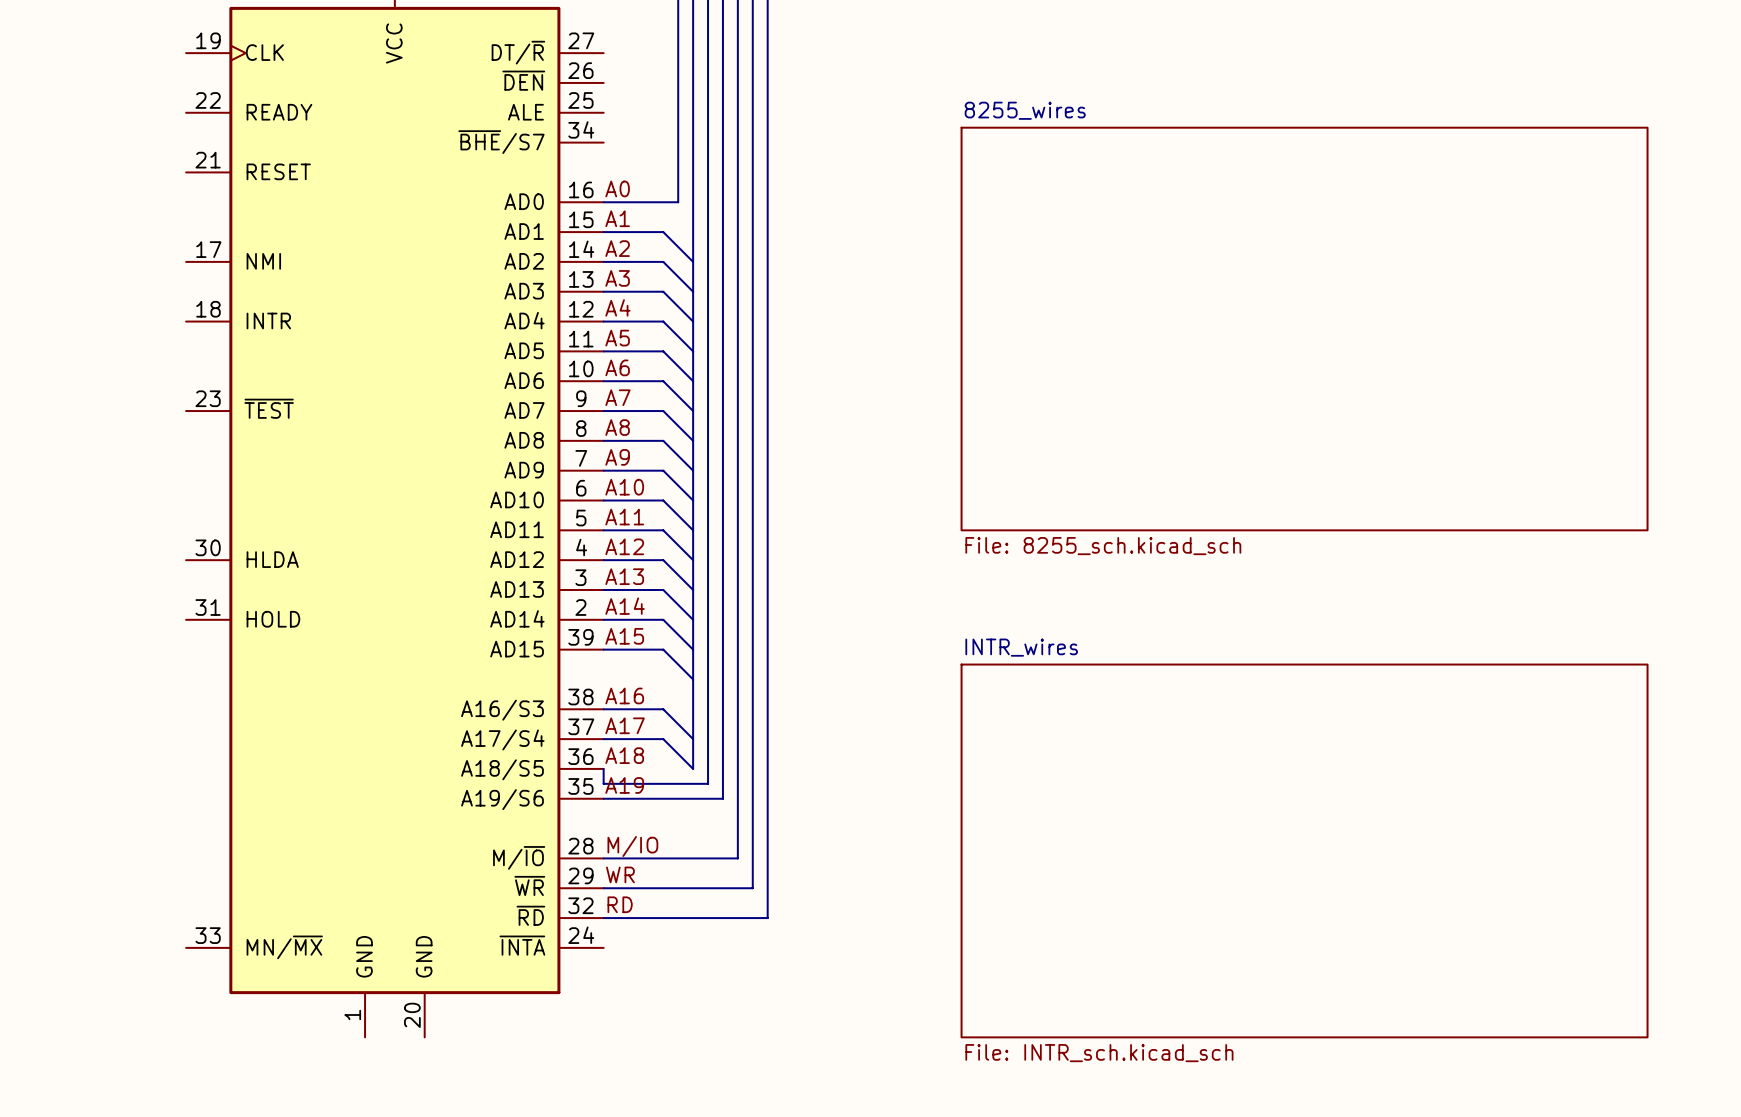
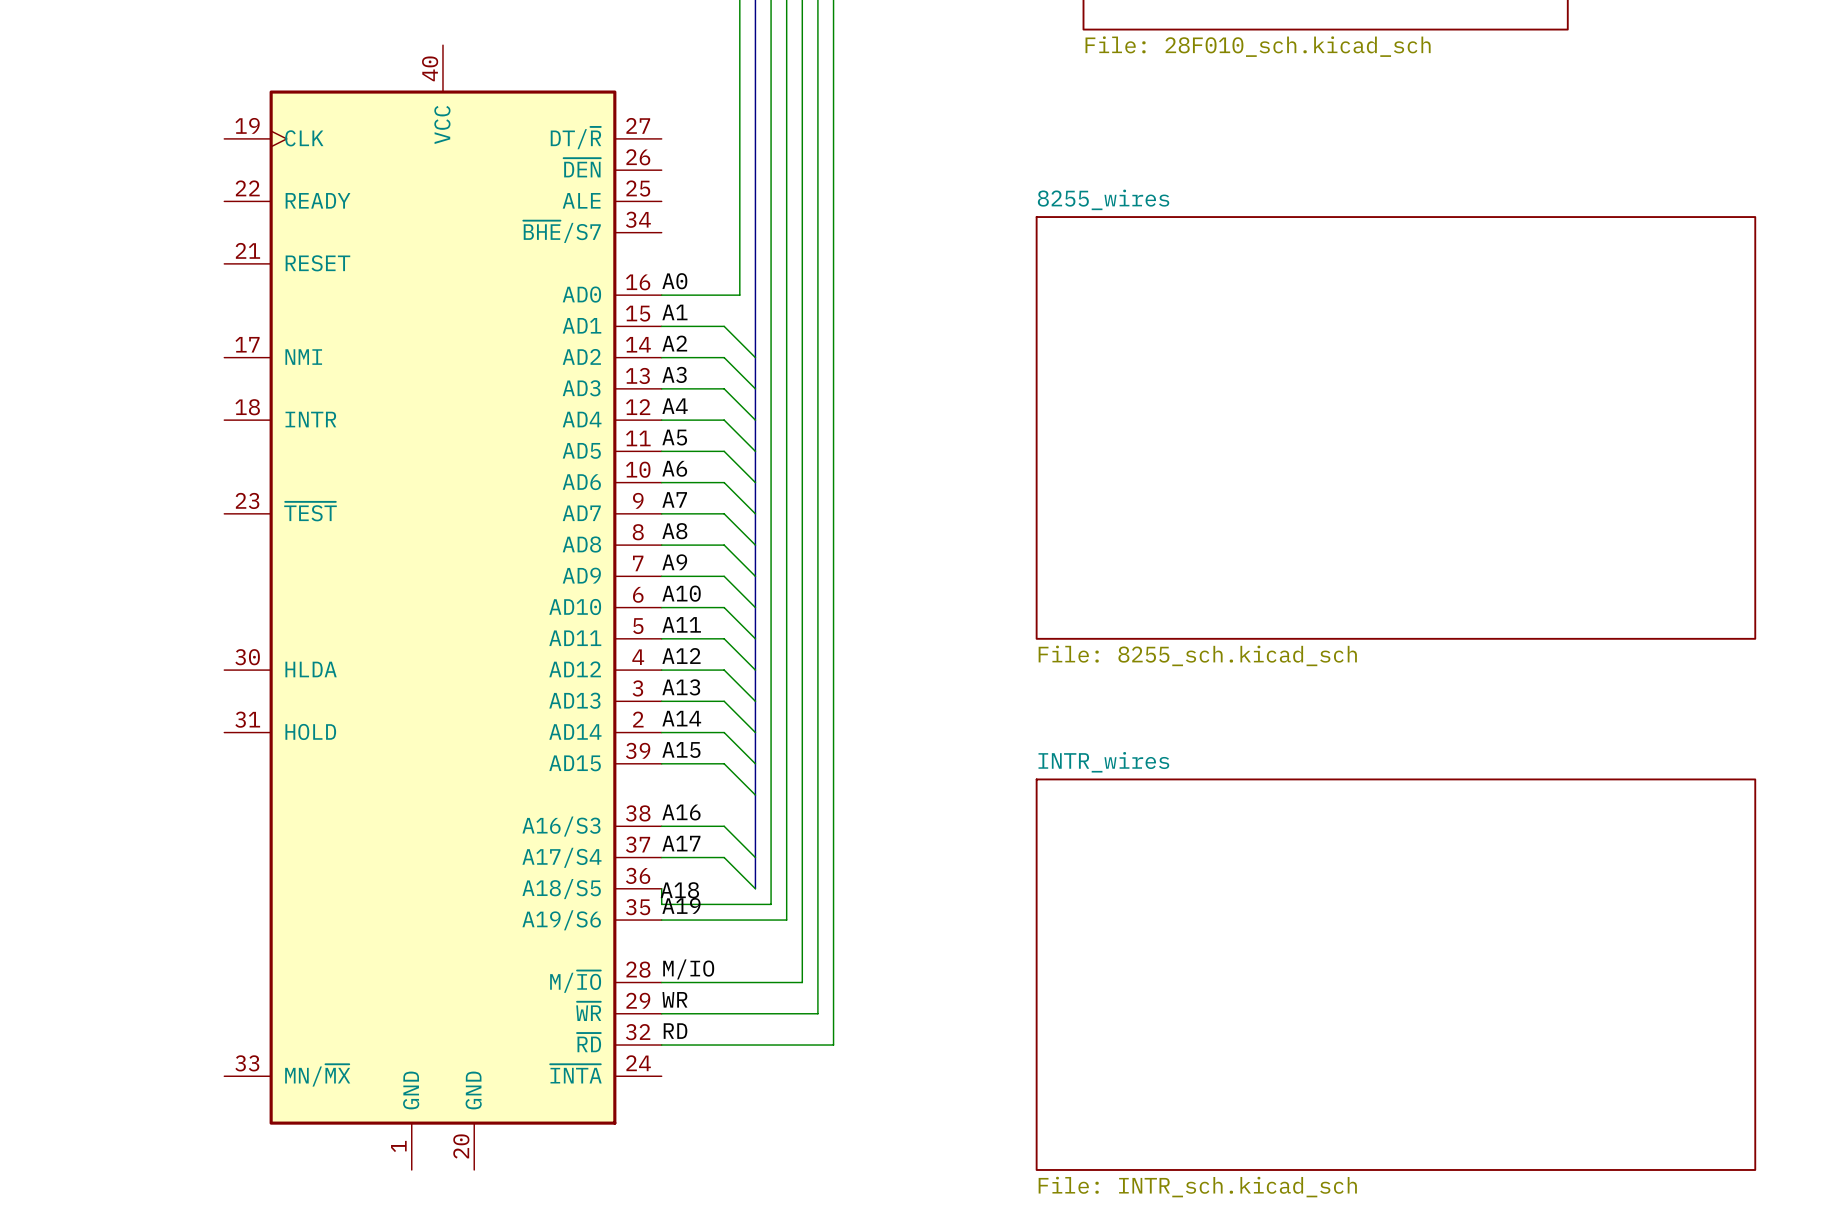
label position: A18 (624, 755) -> A18 (679, 890)

